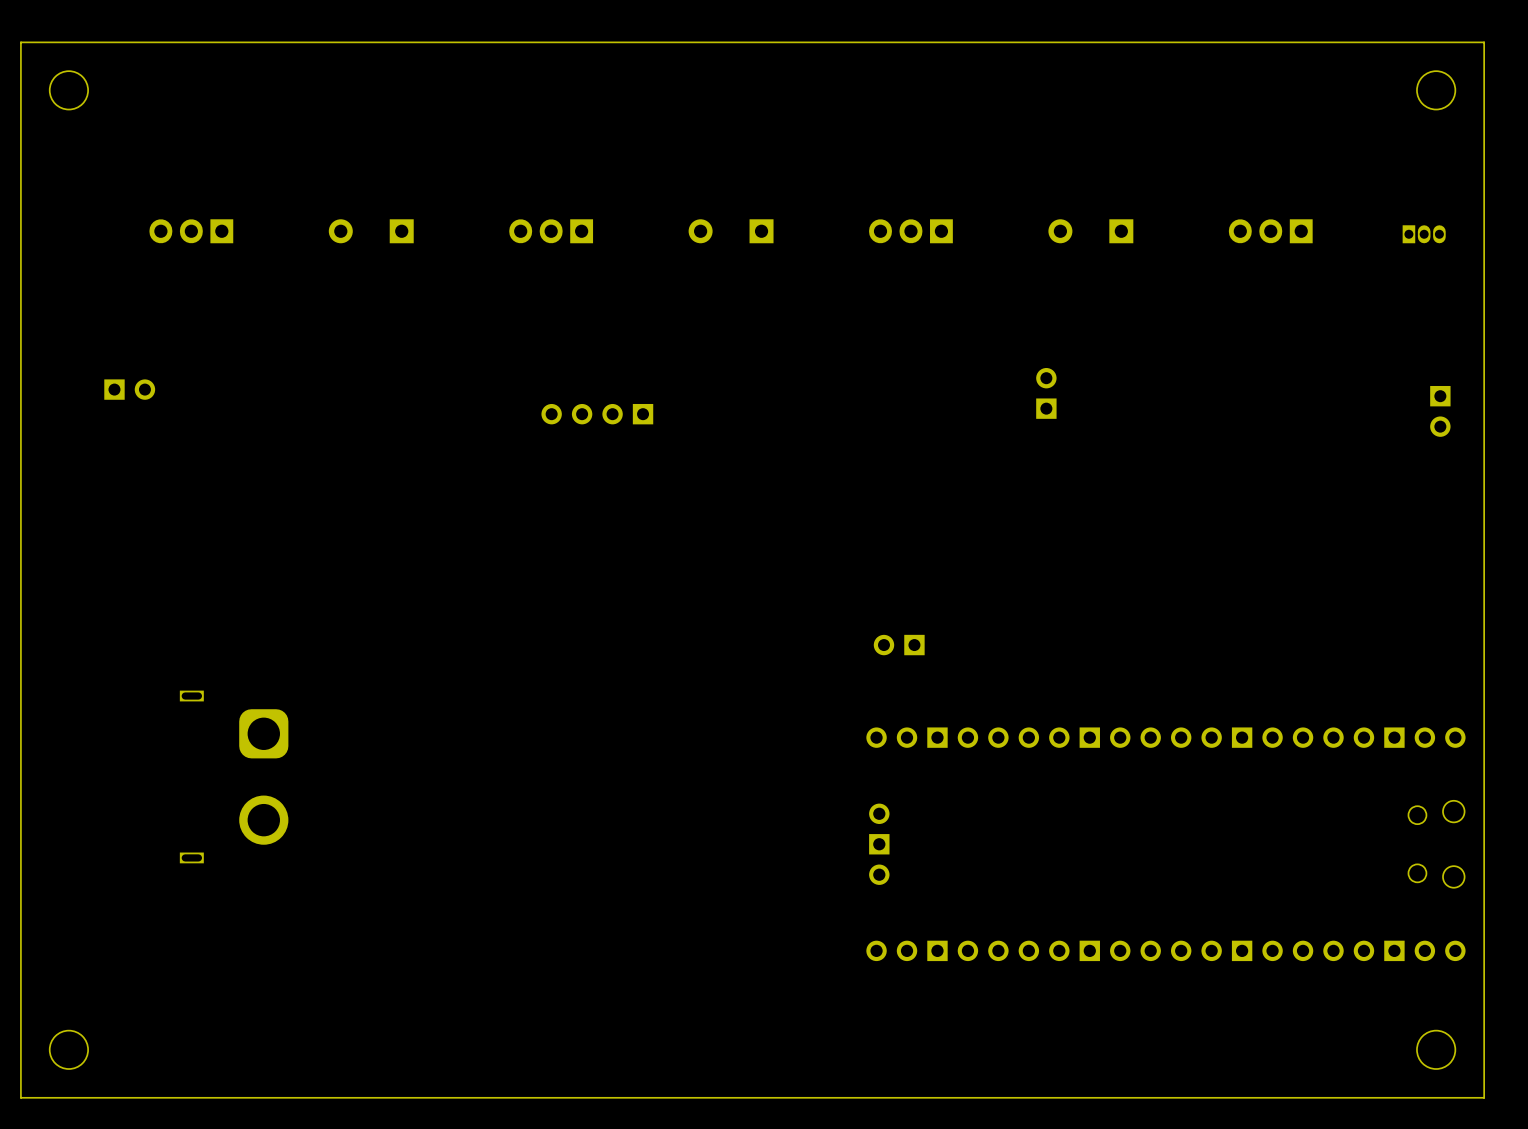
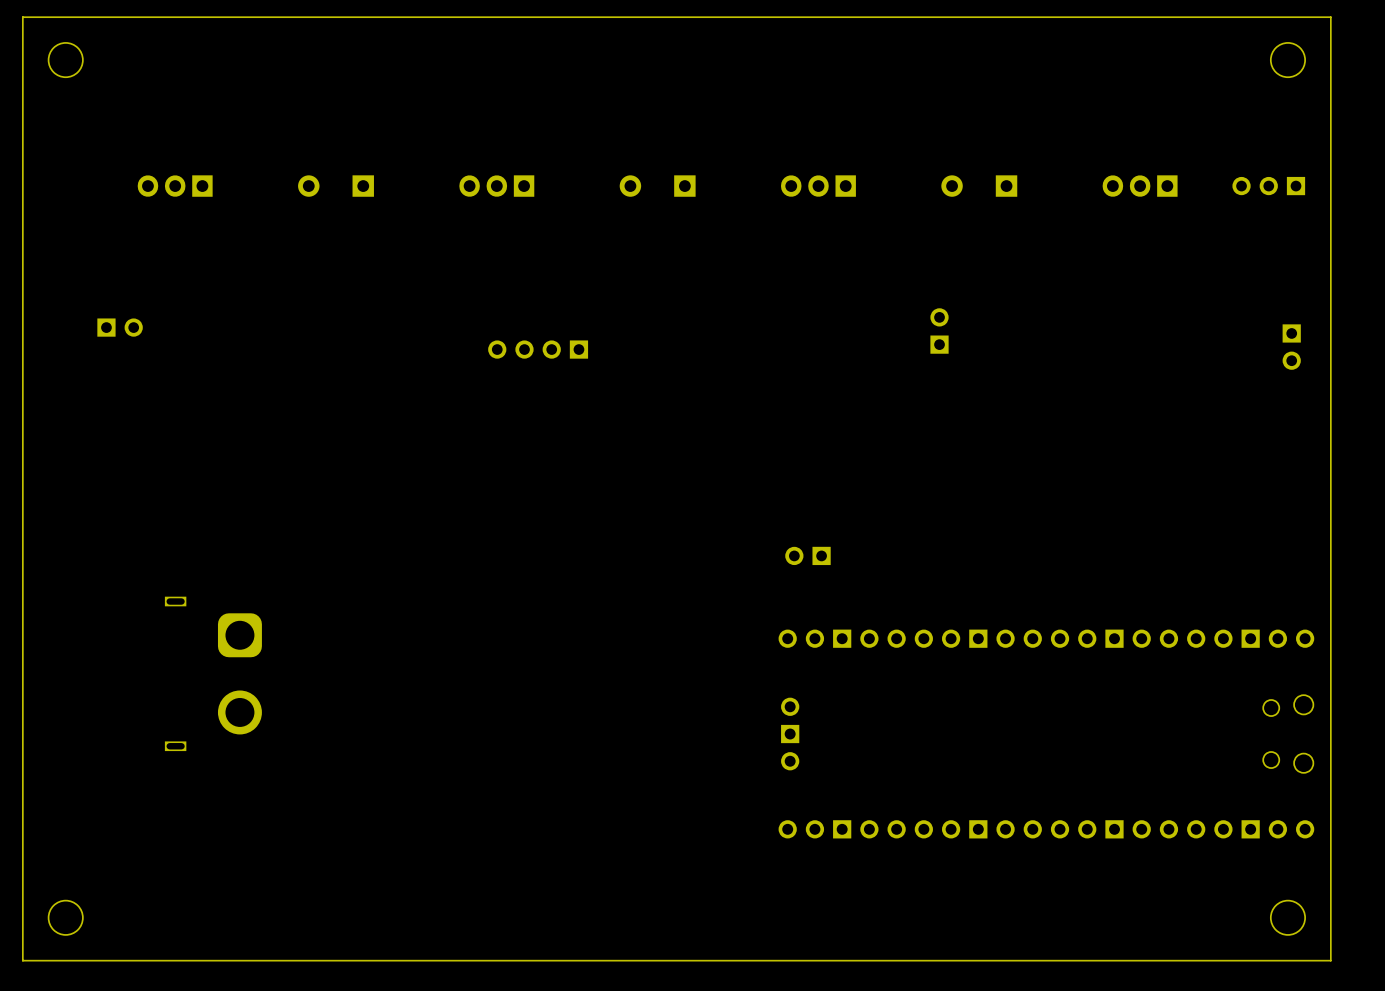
part footprint: [1402, 225, 1446, 244] -> [1232, 176, 1306, 196]

